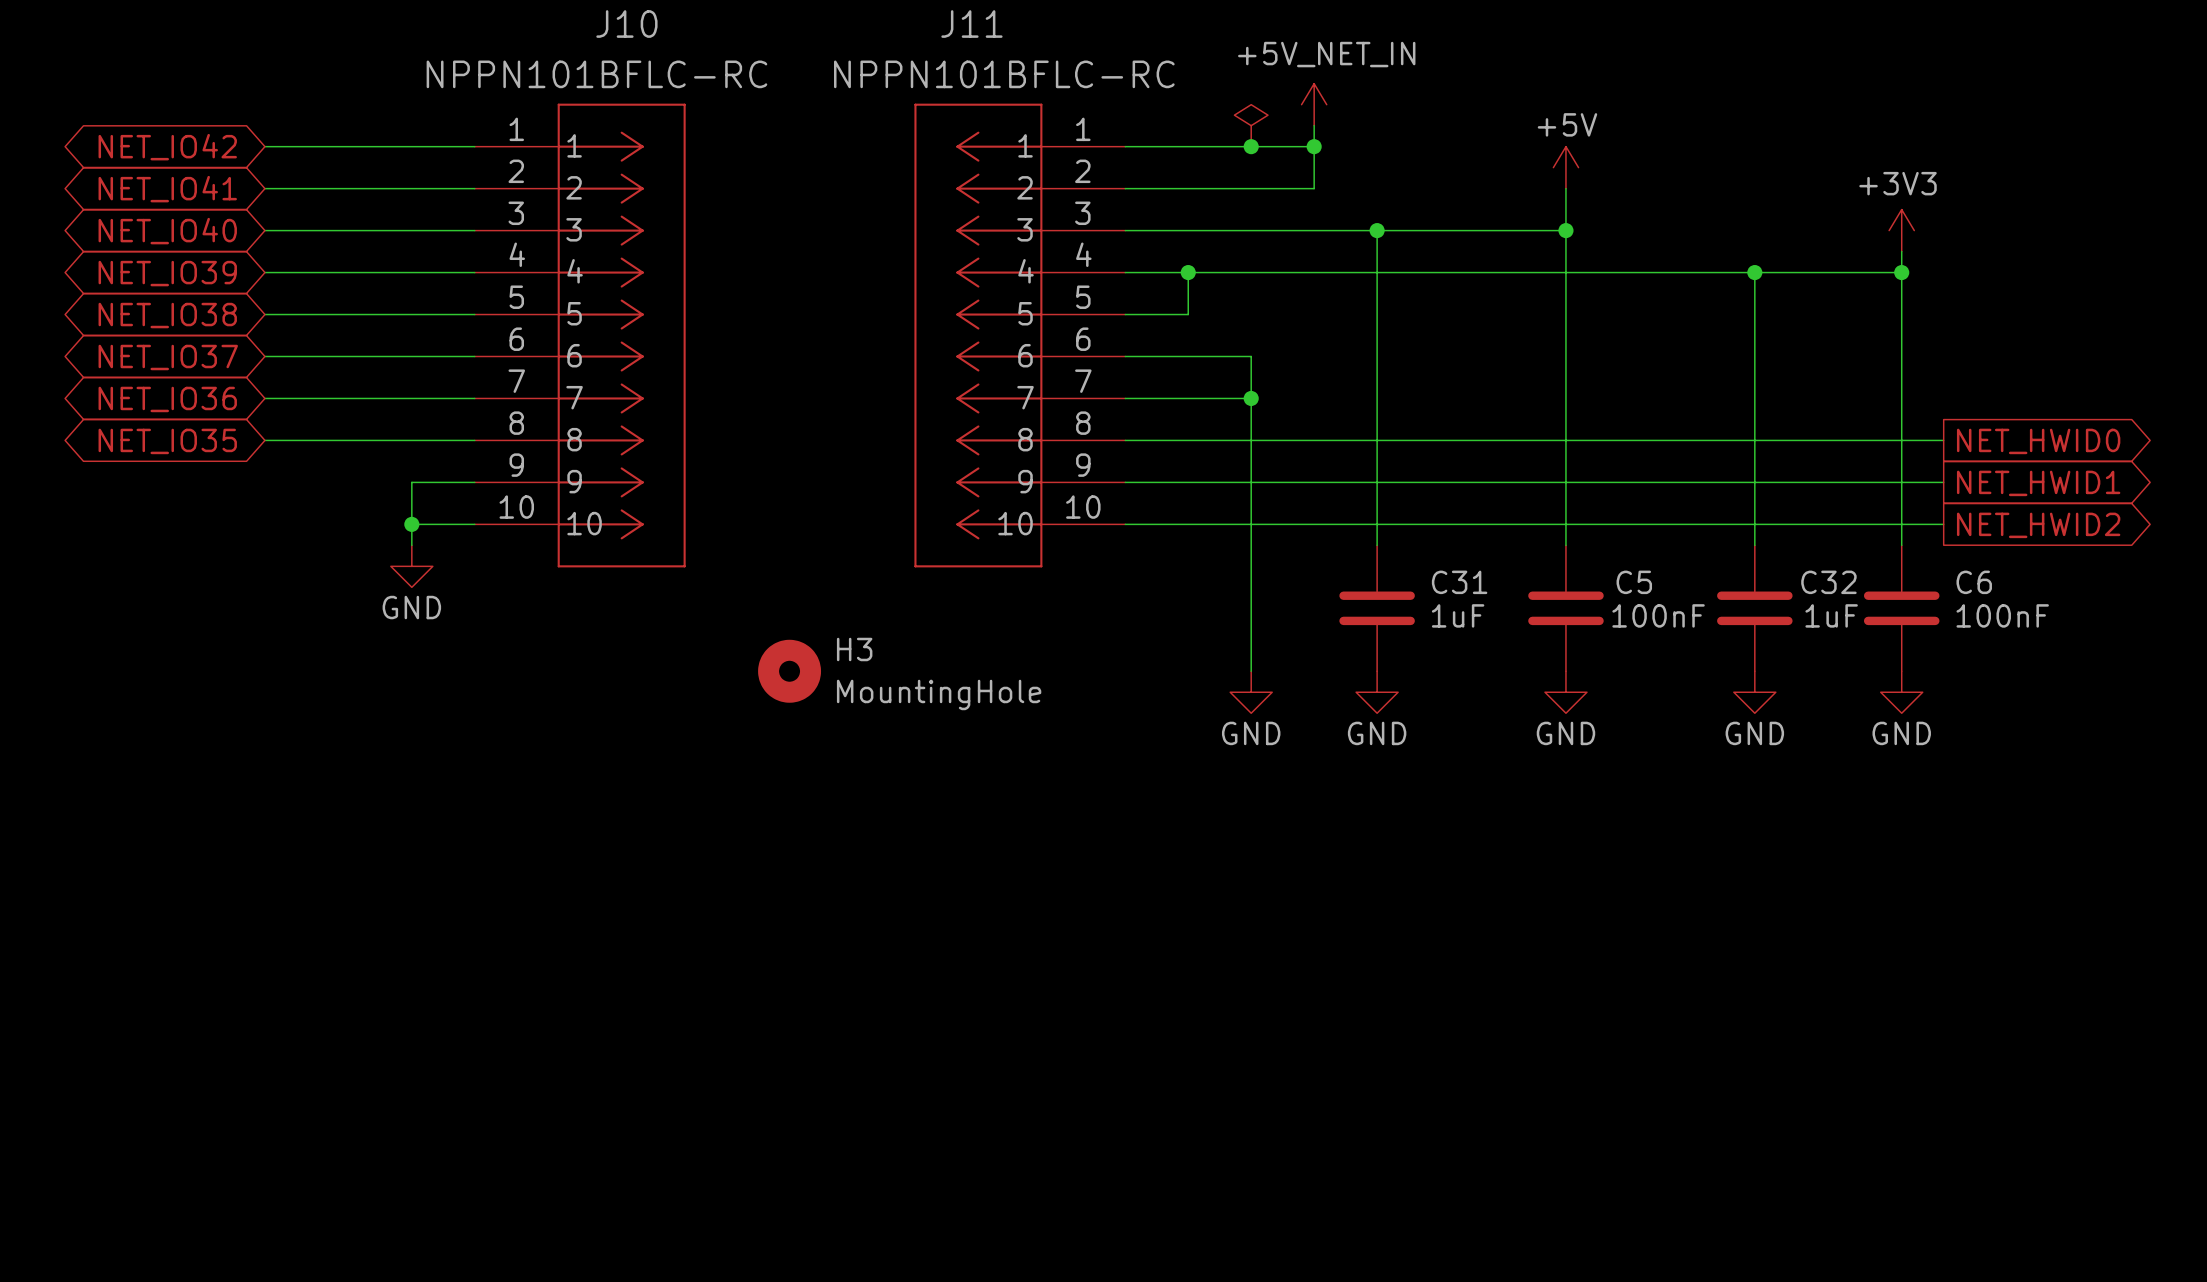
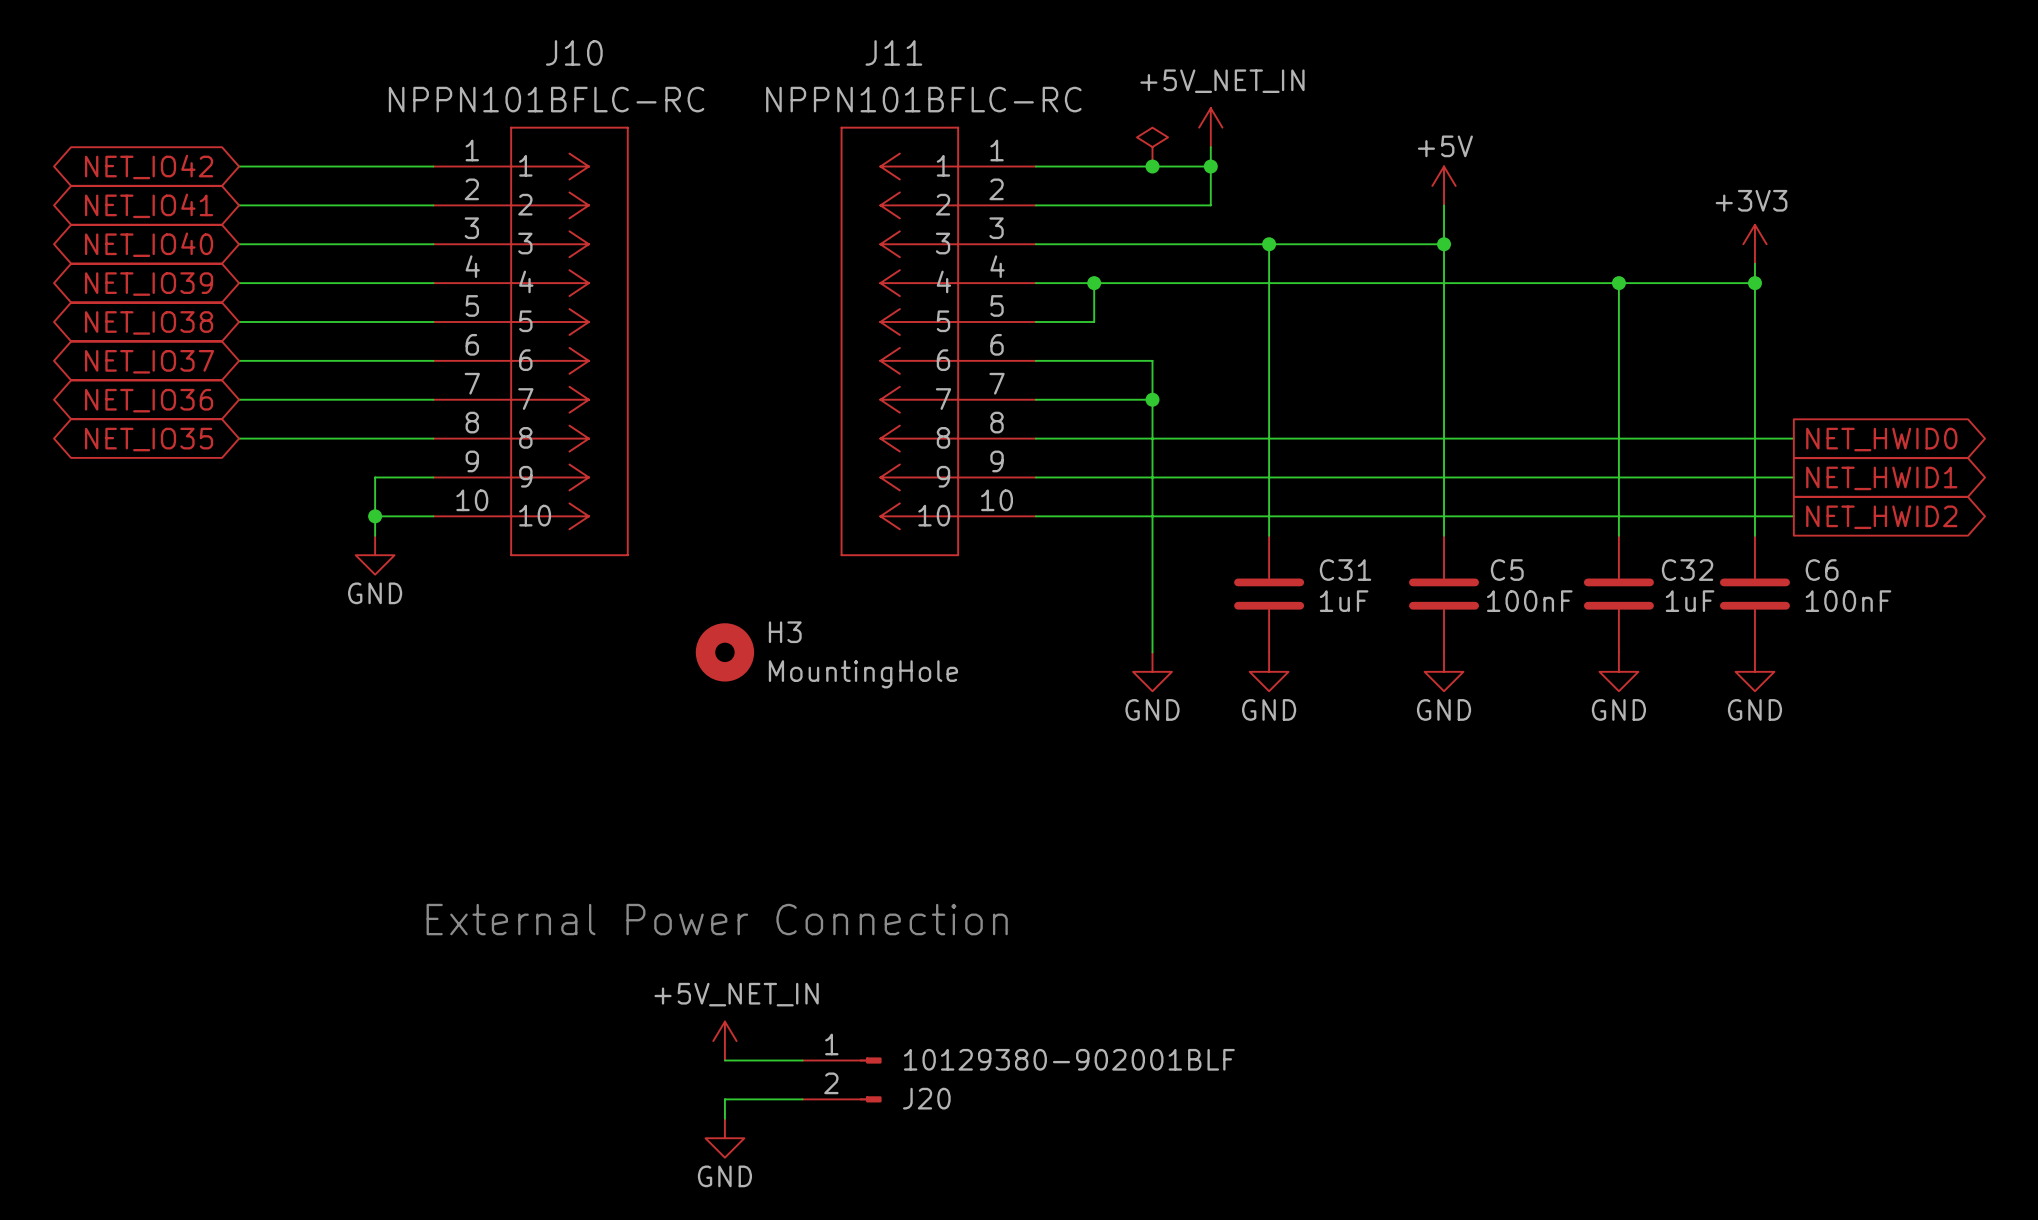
text: none -> External Power Connection (717, 919)
power symbol: none -> +5V_NET_IN (724, 1041)
wire: none -> (724, 1060) (802, 1060)
J20: none -> 10129380-902001BLF (842, 1079)
wire: none -> (802, 1099) (724, 1099) (724, 1118)
power symbol: none -> GND (724, 1138)

